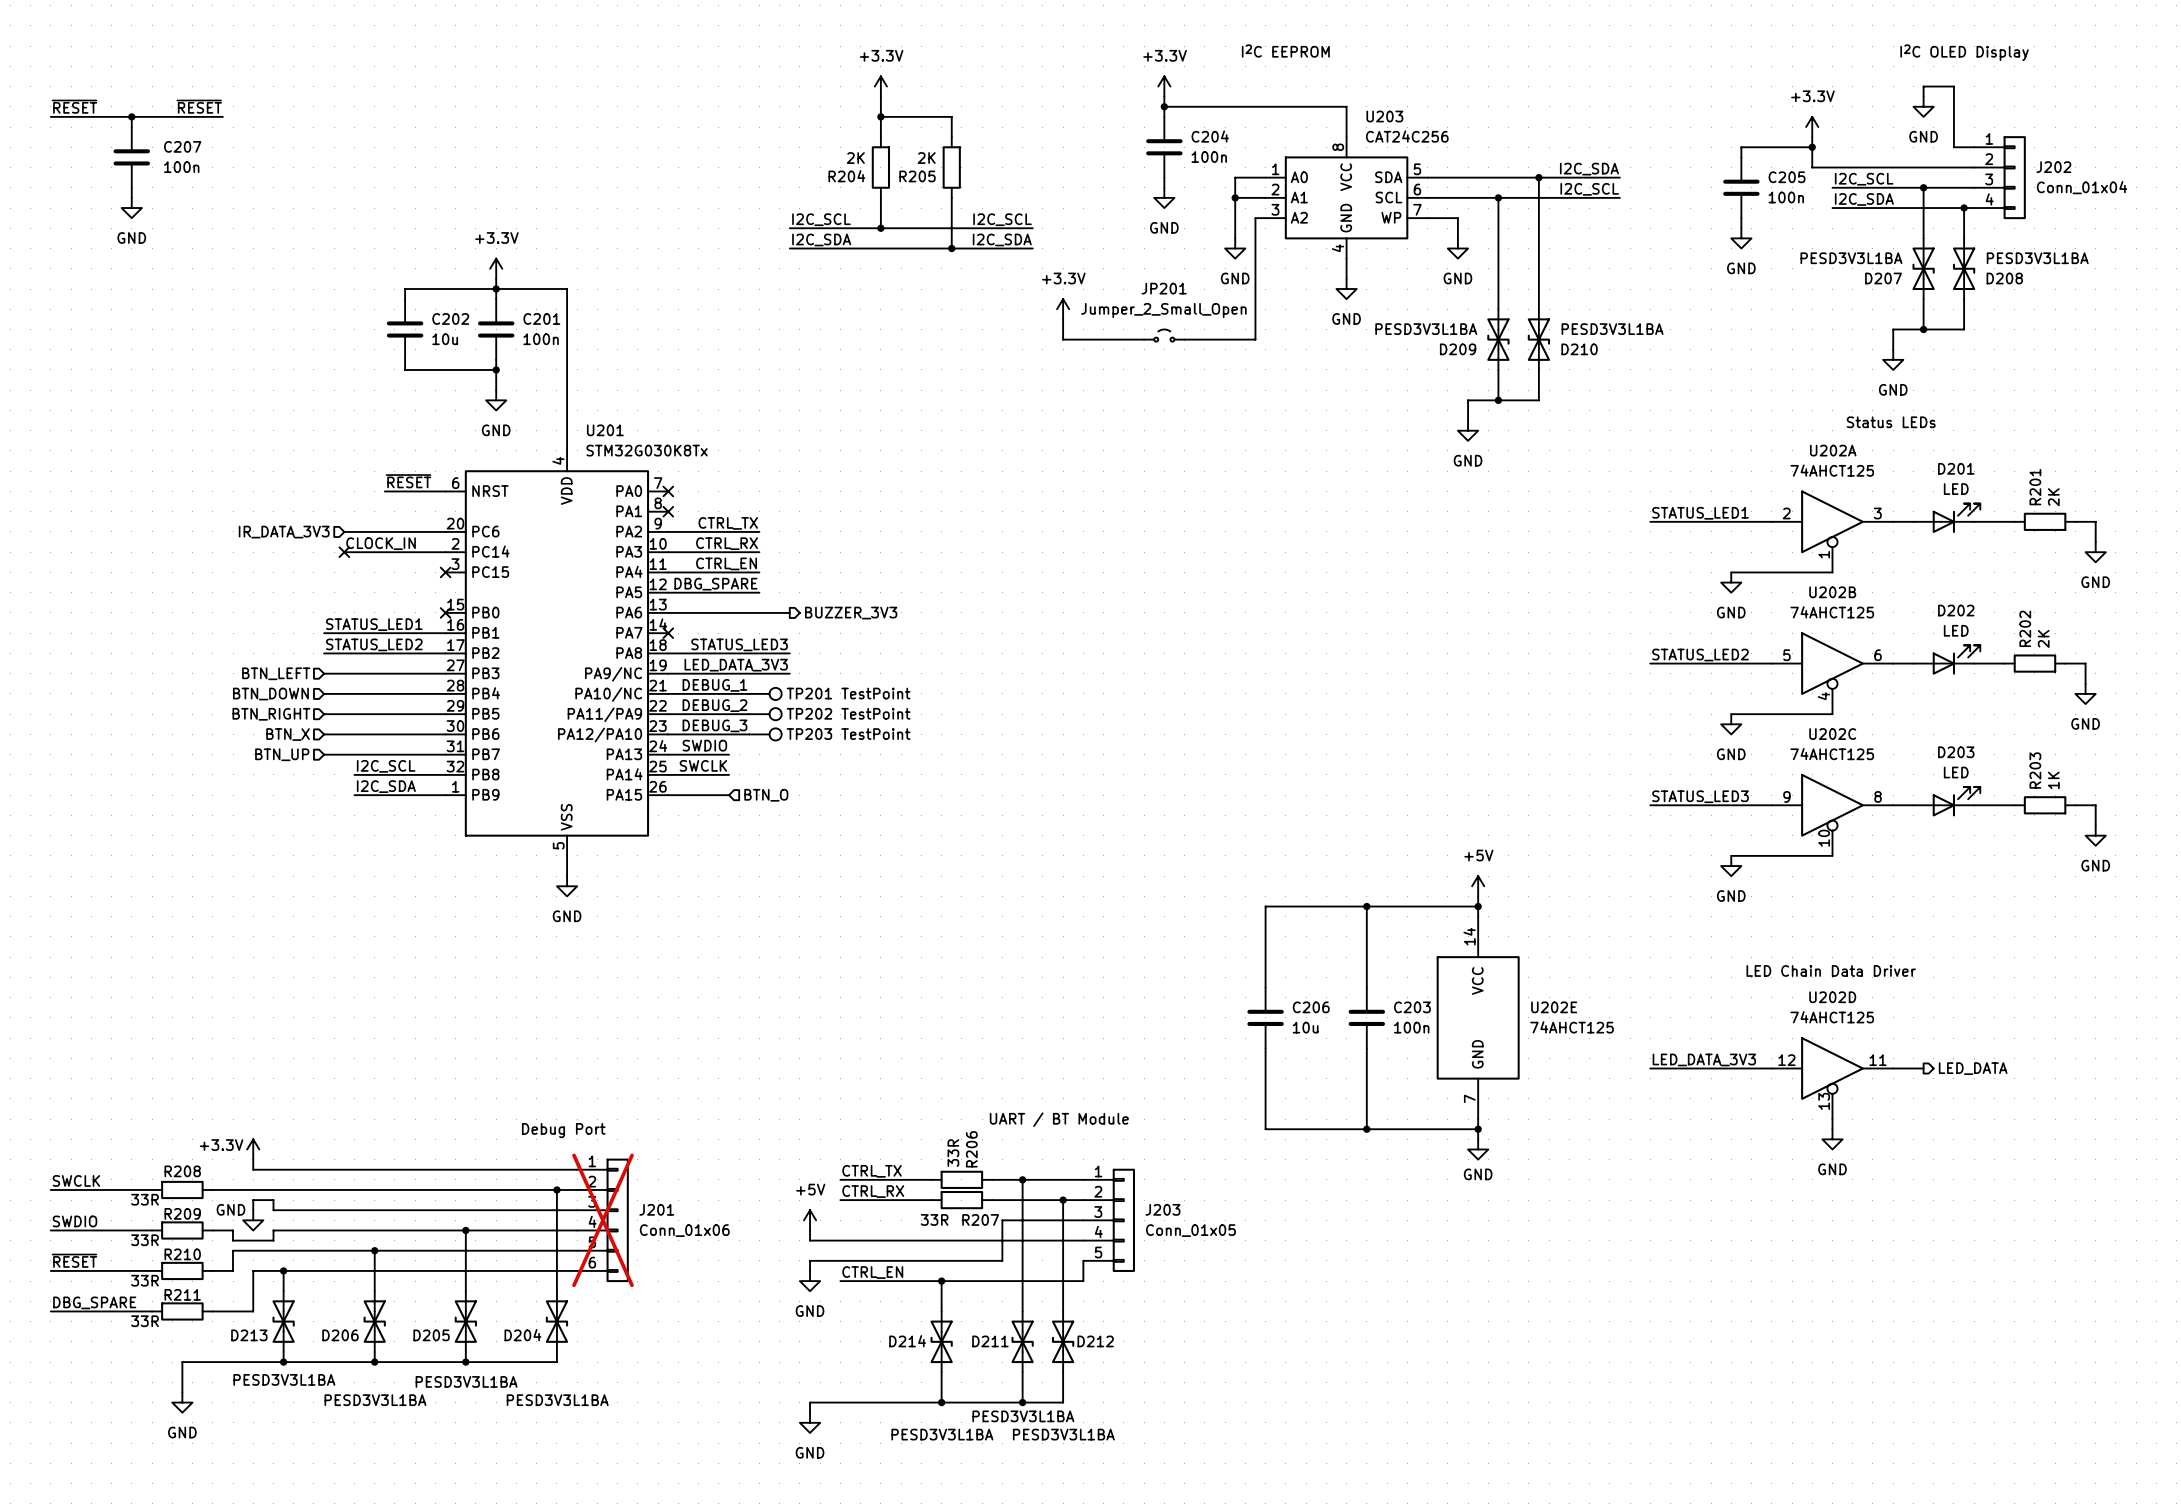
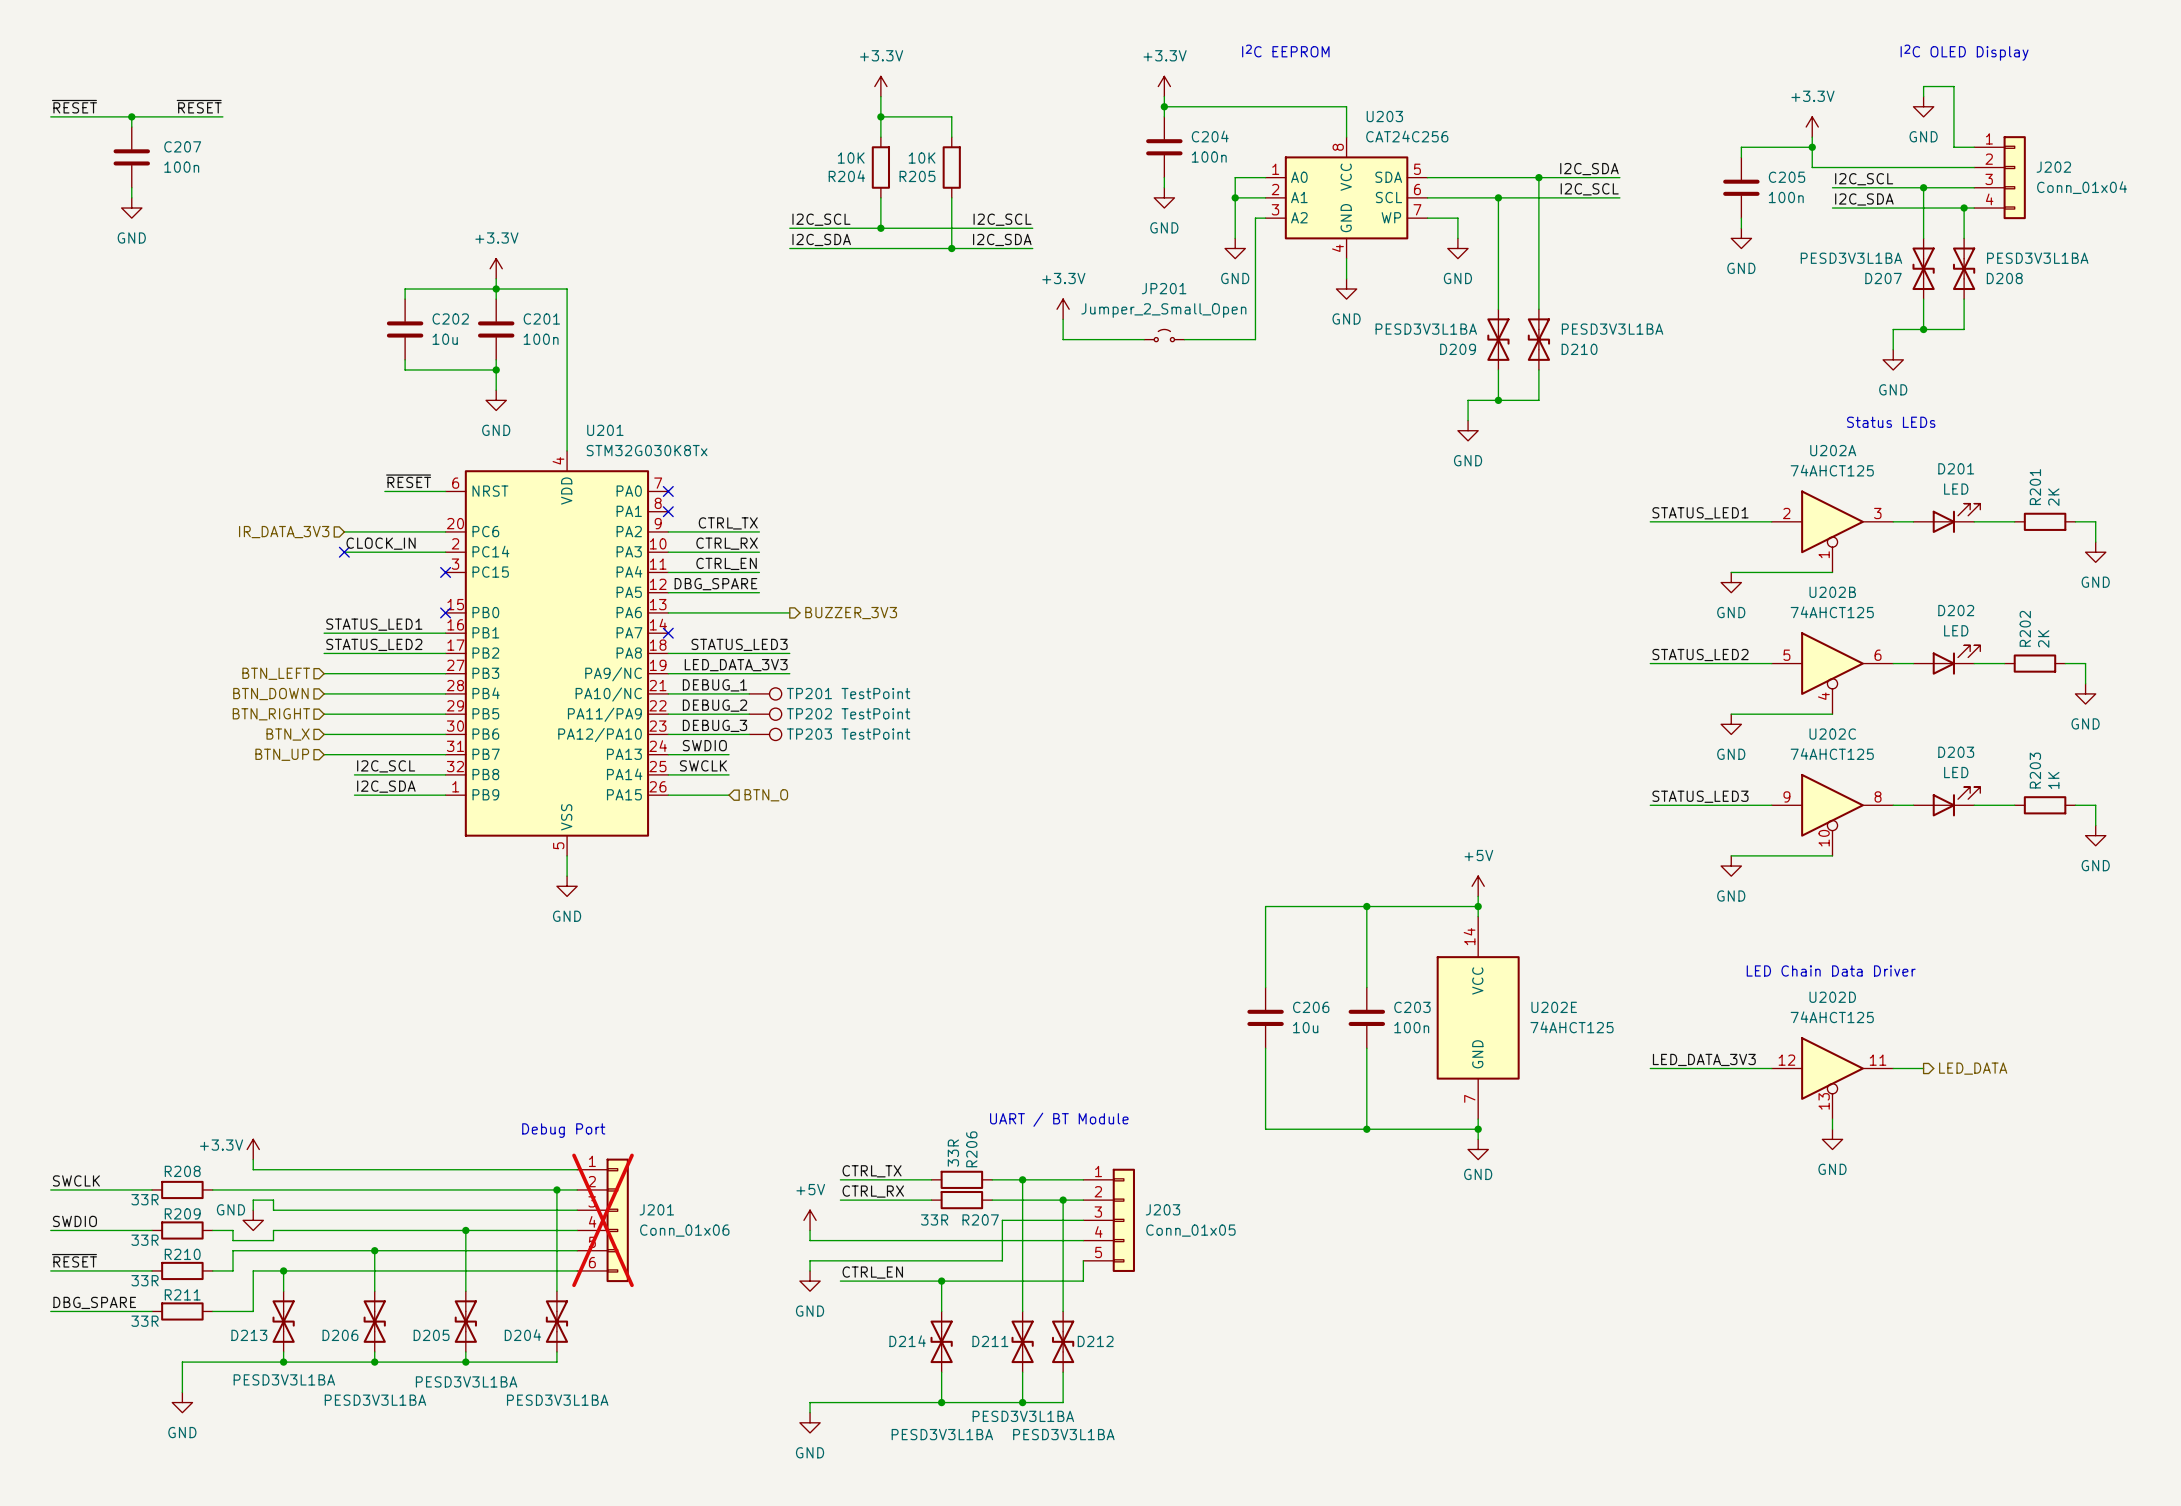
R204 value: 2K (855, 158) -> 10K (851, 158)
R205 value: 2K (926, 158) -> 10K (922, 158)

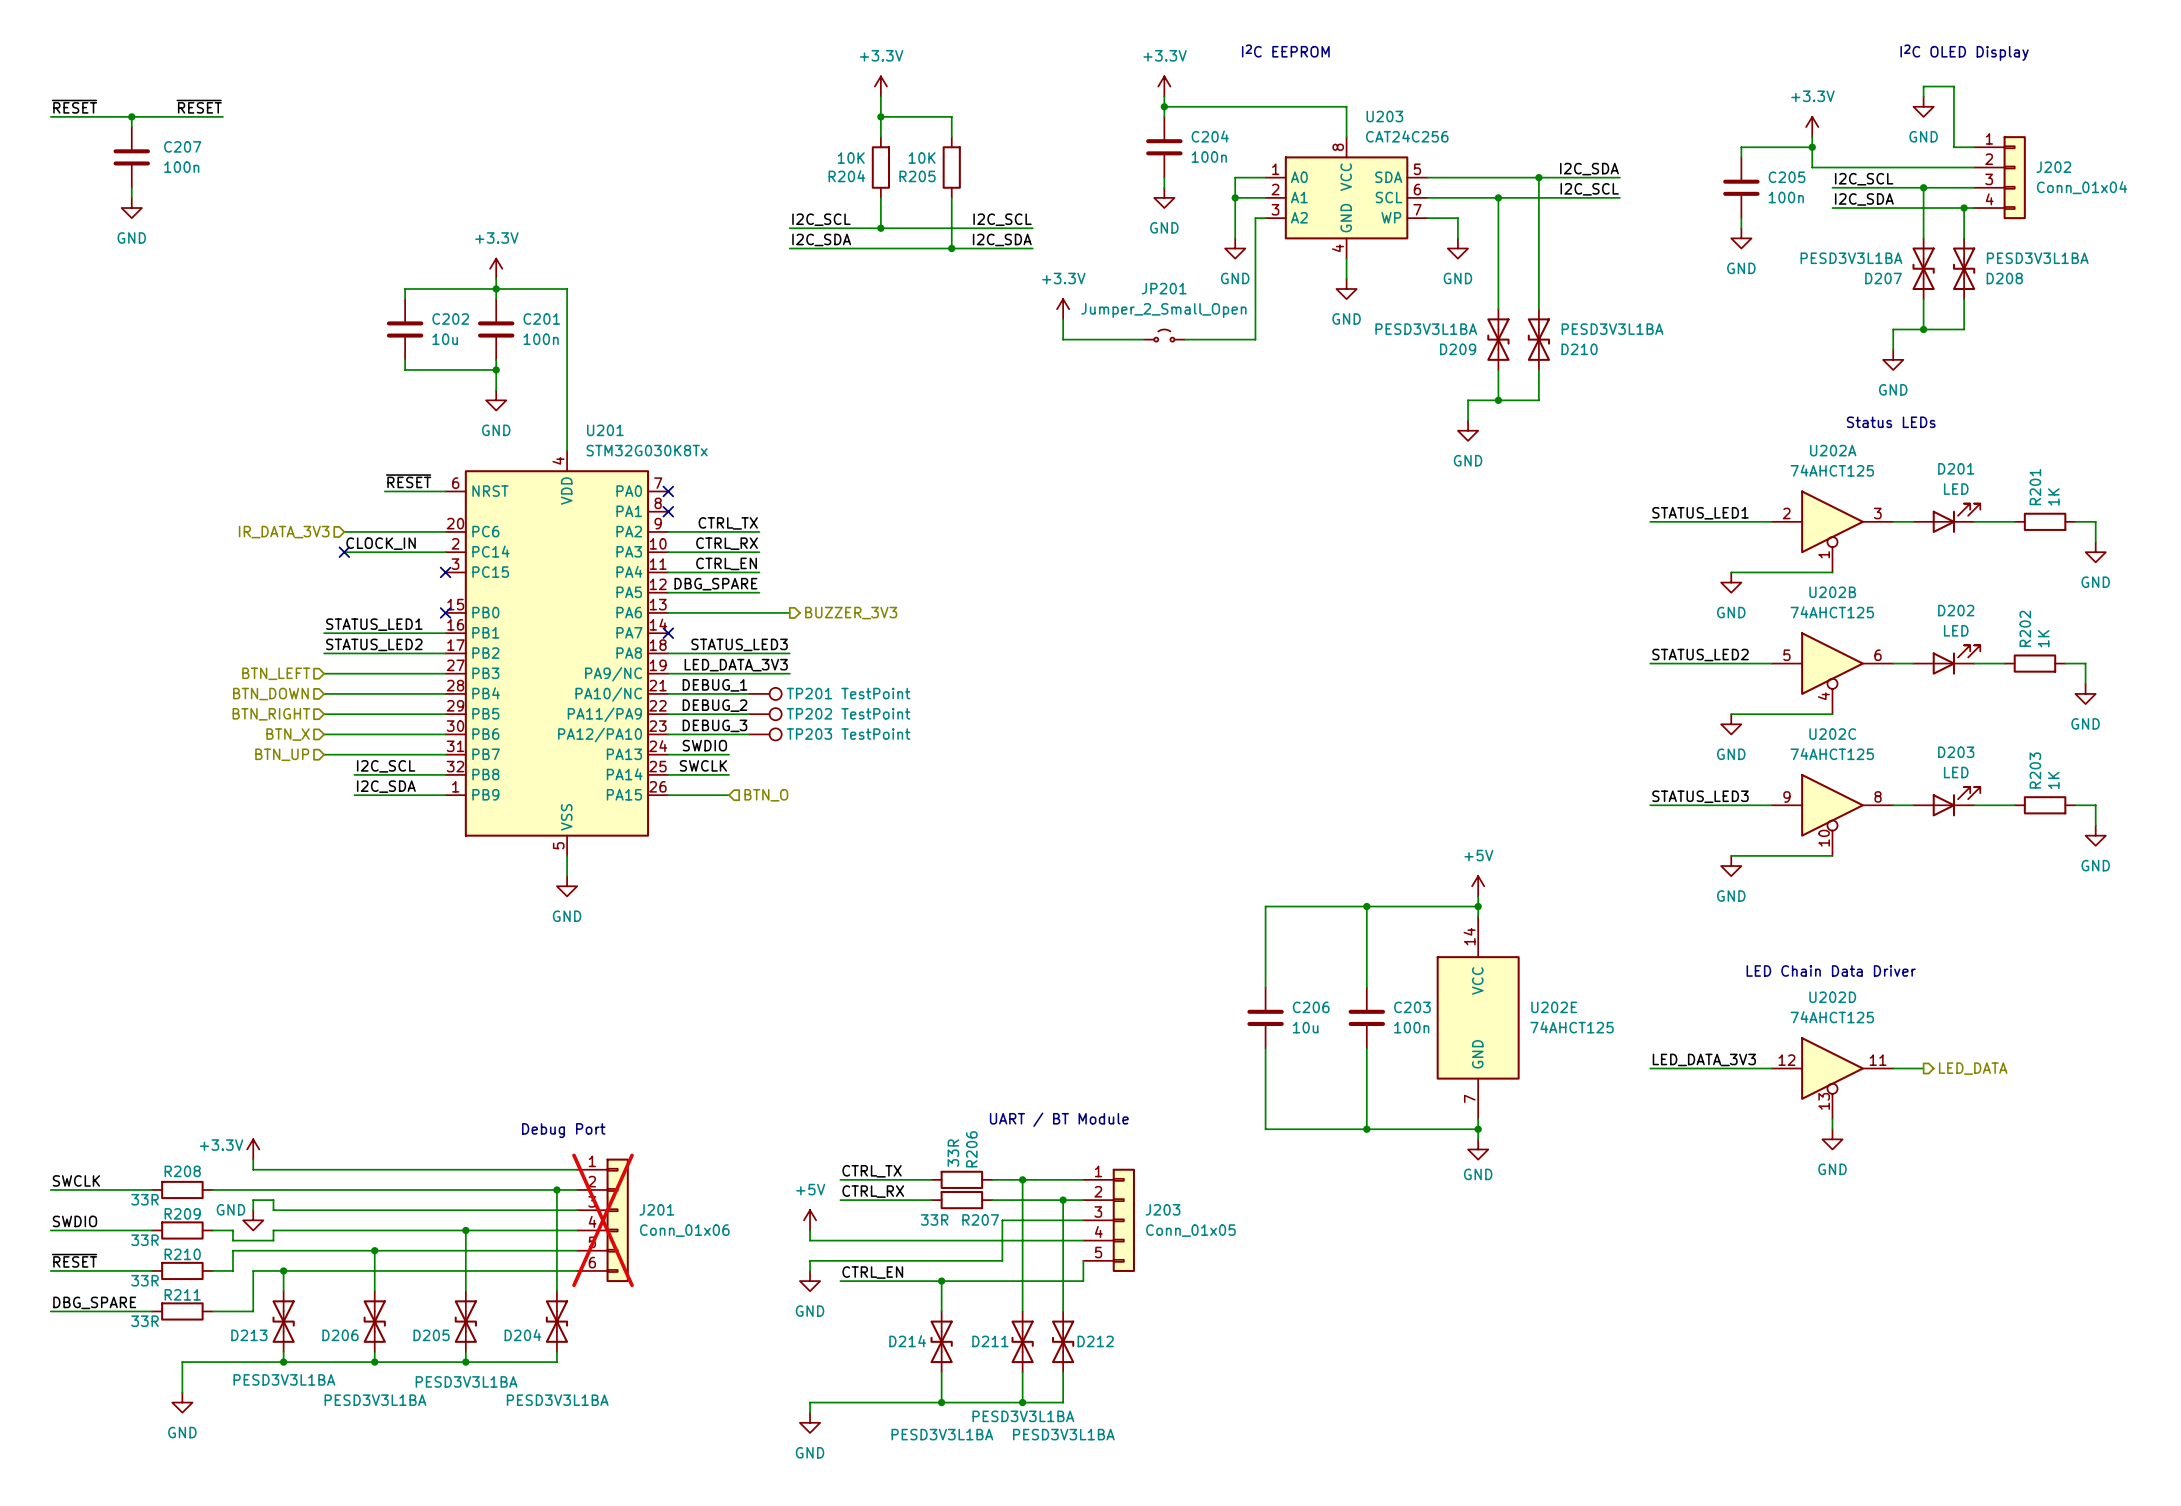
R201 value: 2K (2053, 497) -> 1K (2053, 496)
R202 value: 2K (2043, 638) -> 1K (2043, 638)

